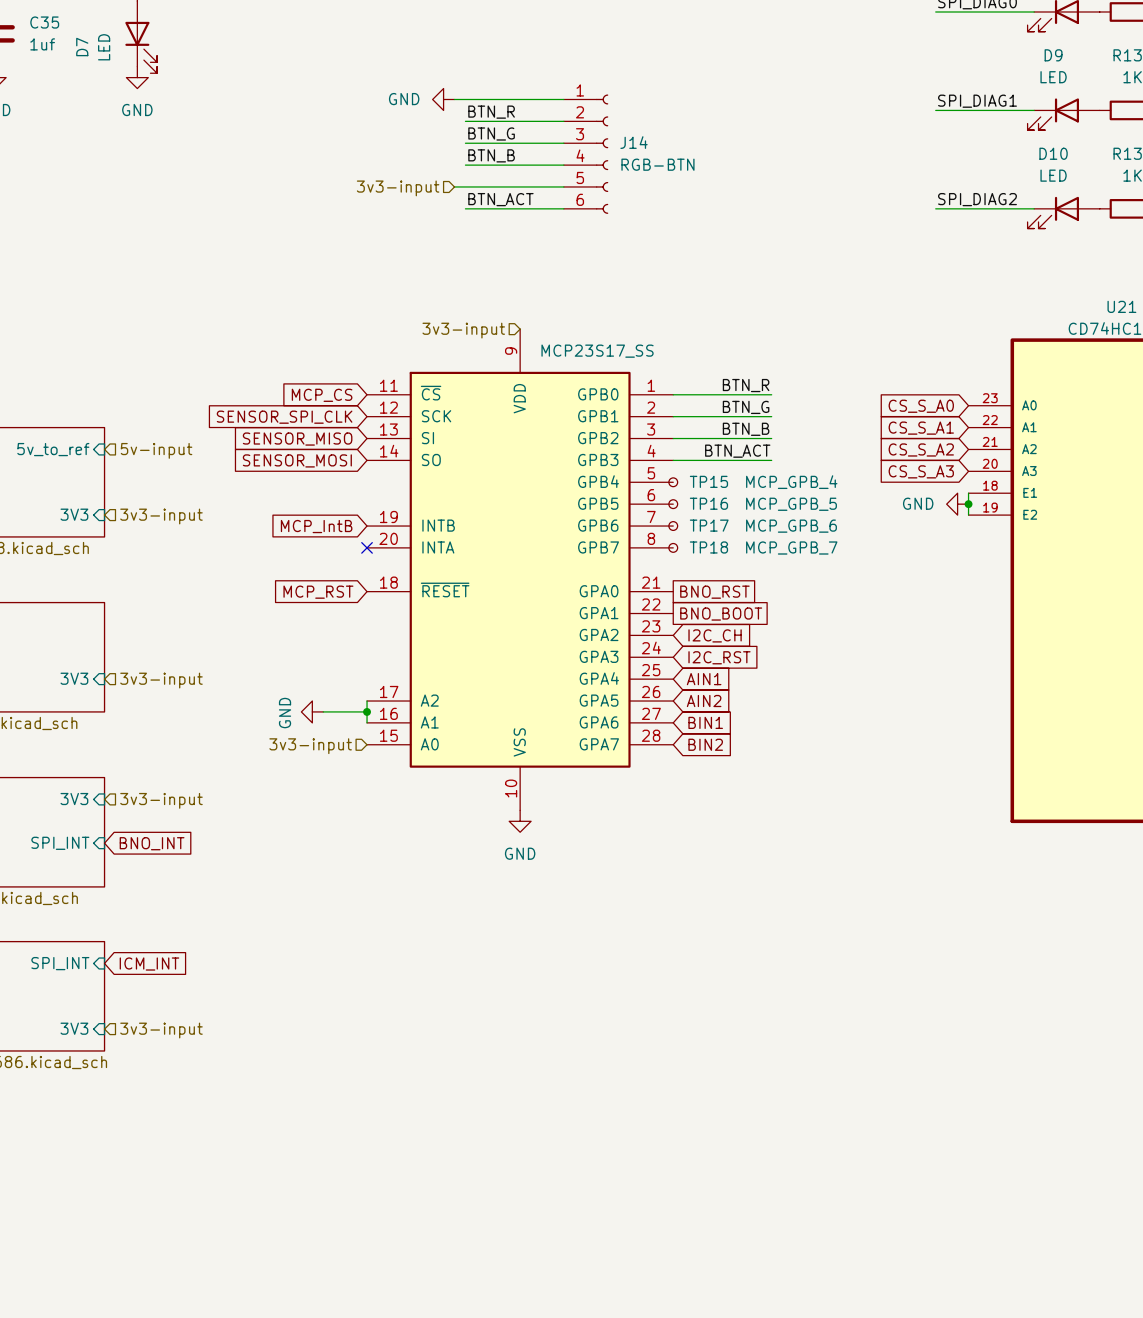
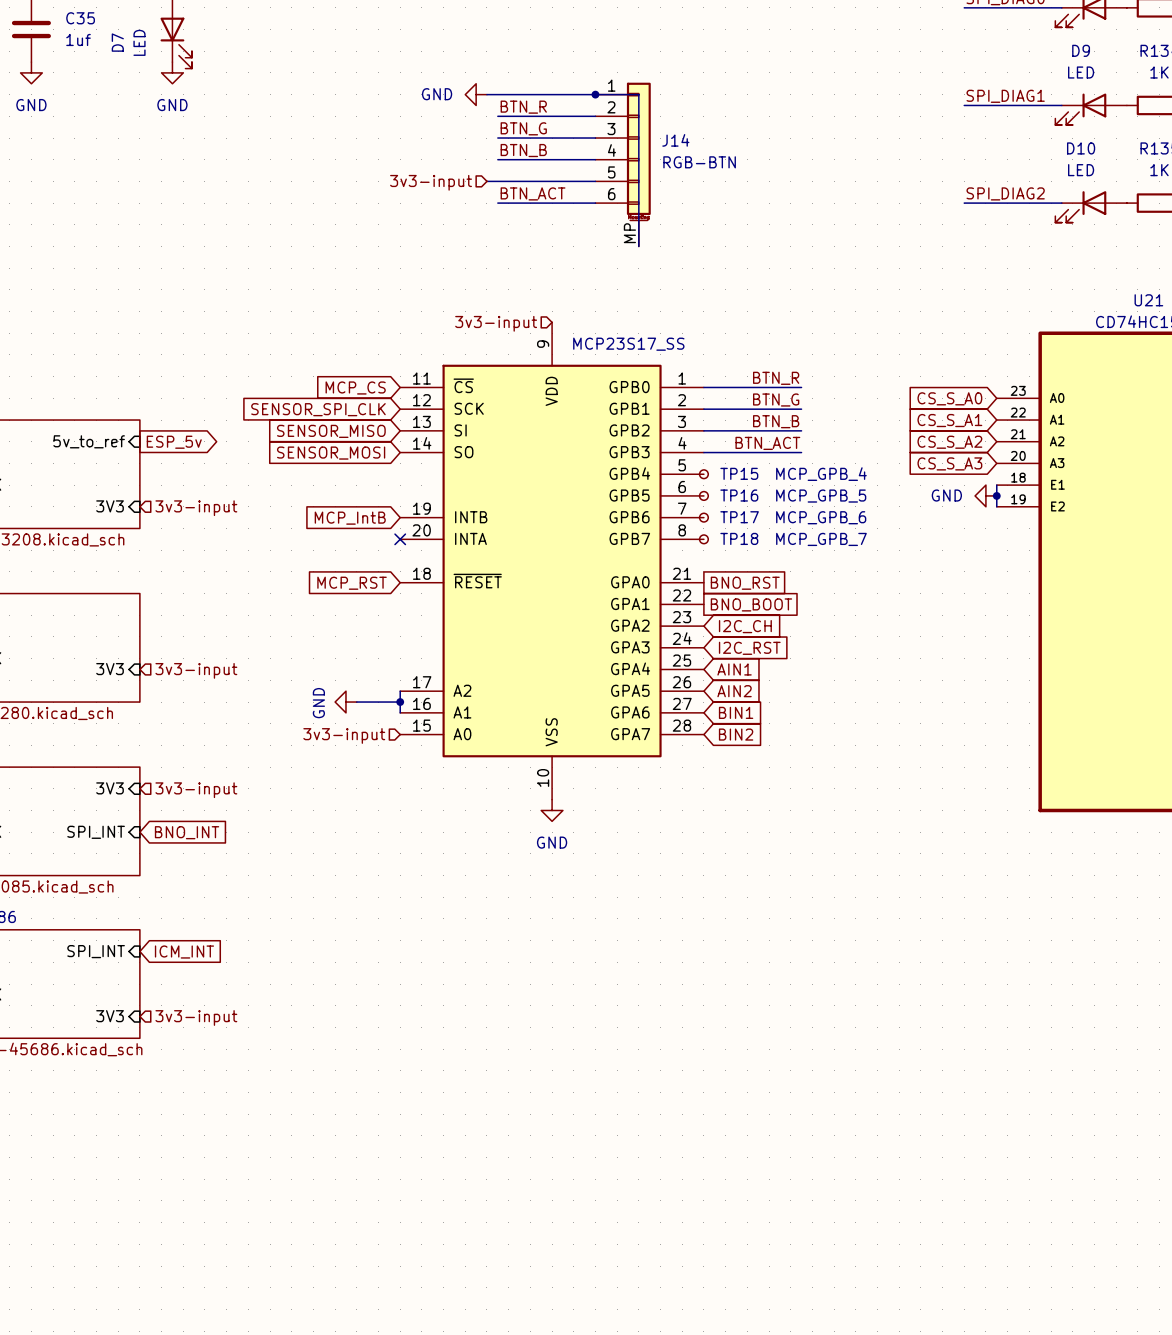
J14 symbol: [563, 94, 609, 214] -> [595, 82, 651, 247]
wire: none -> (595, 94) (638, 94) (638, 246)
junction: none -> (595, 94)
global label: none -> ESP_5v (174, 442)
hierarchical label: 5v-input (156, 450) -> none

